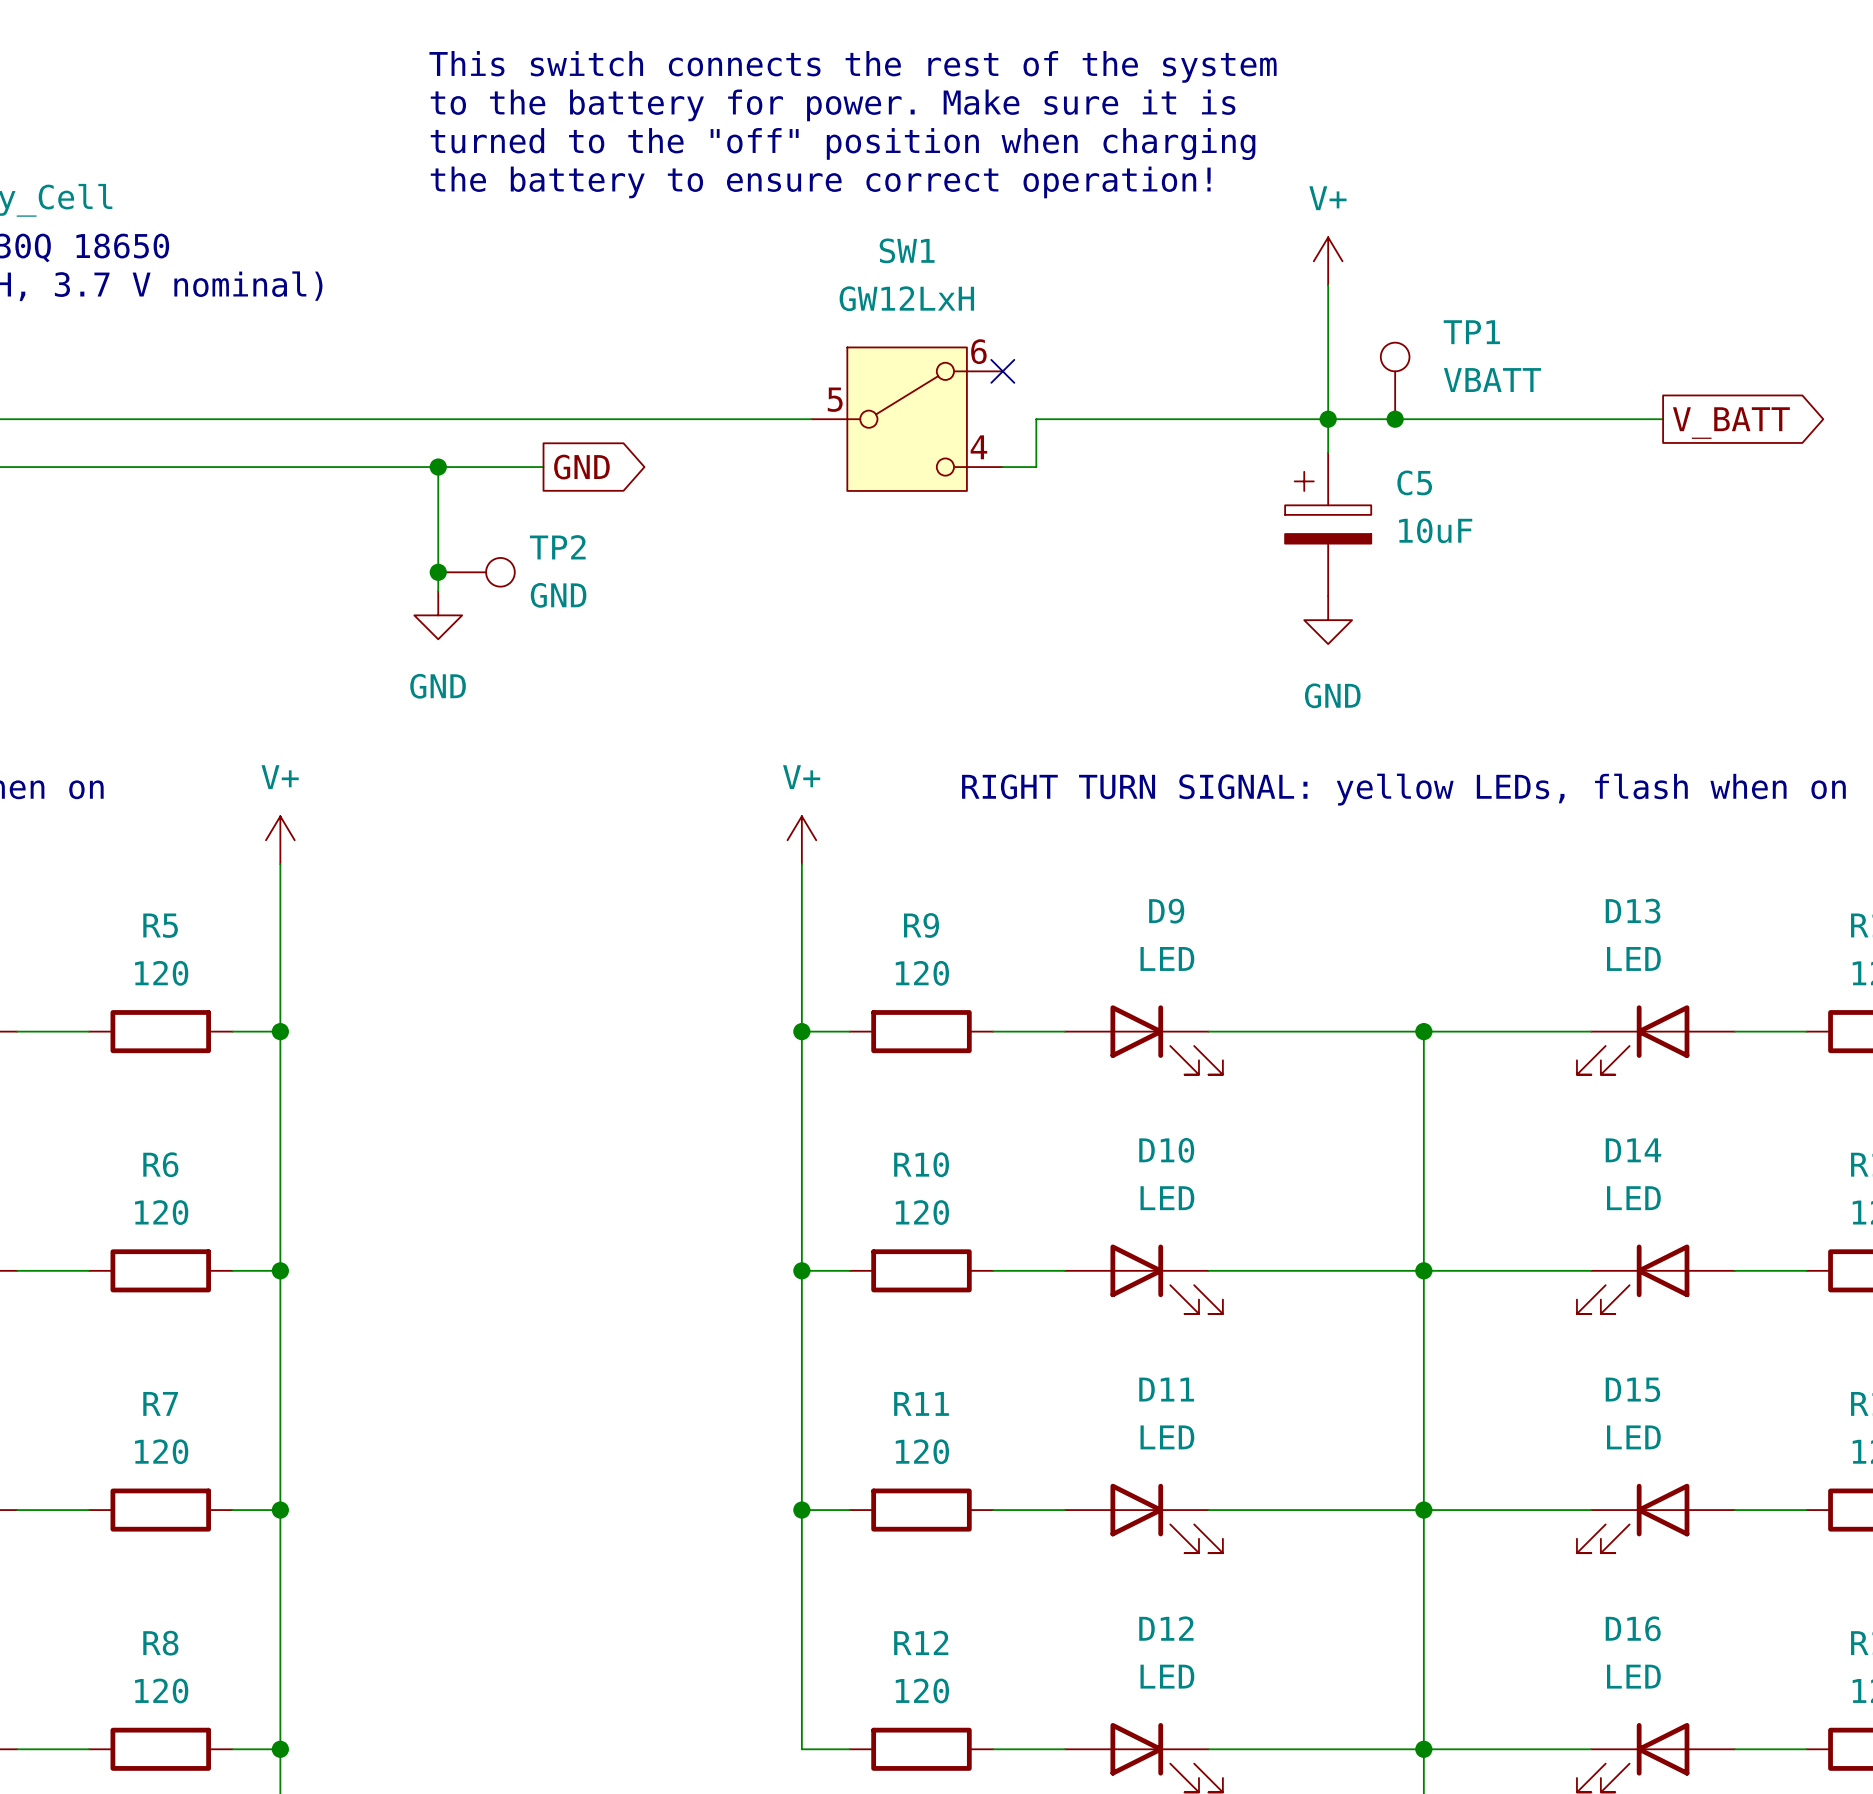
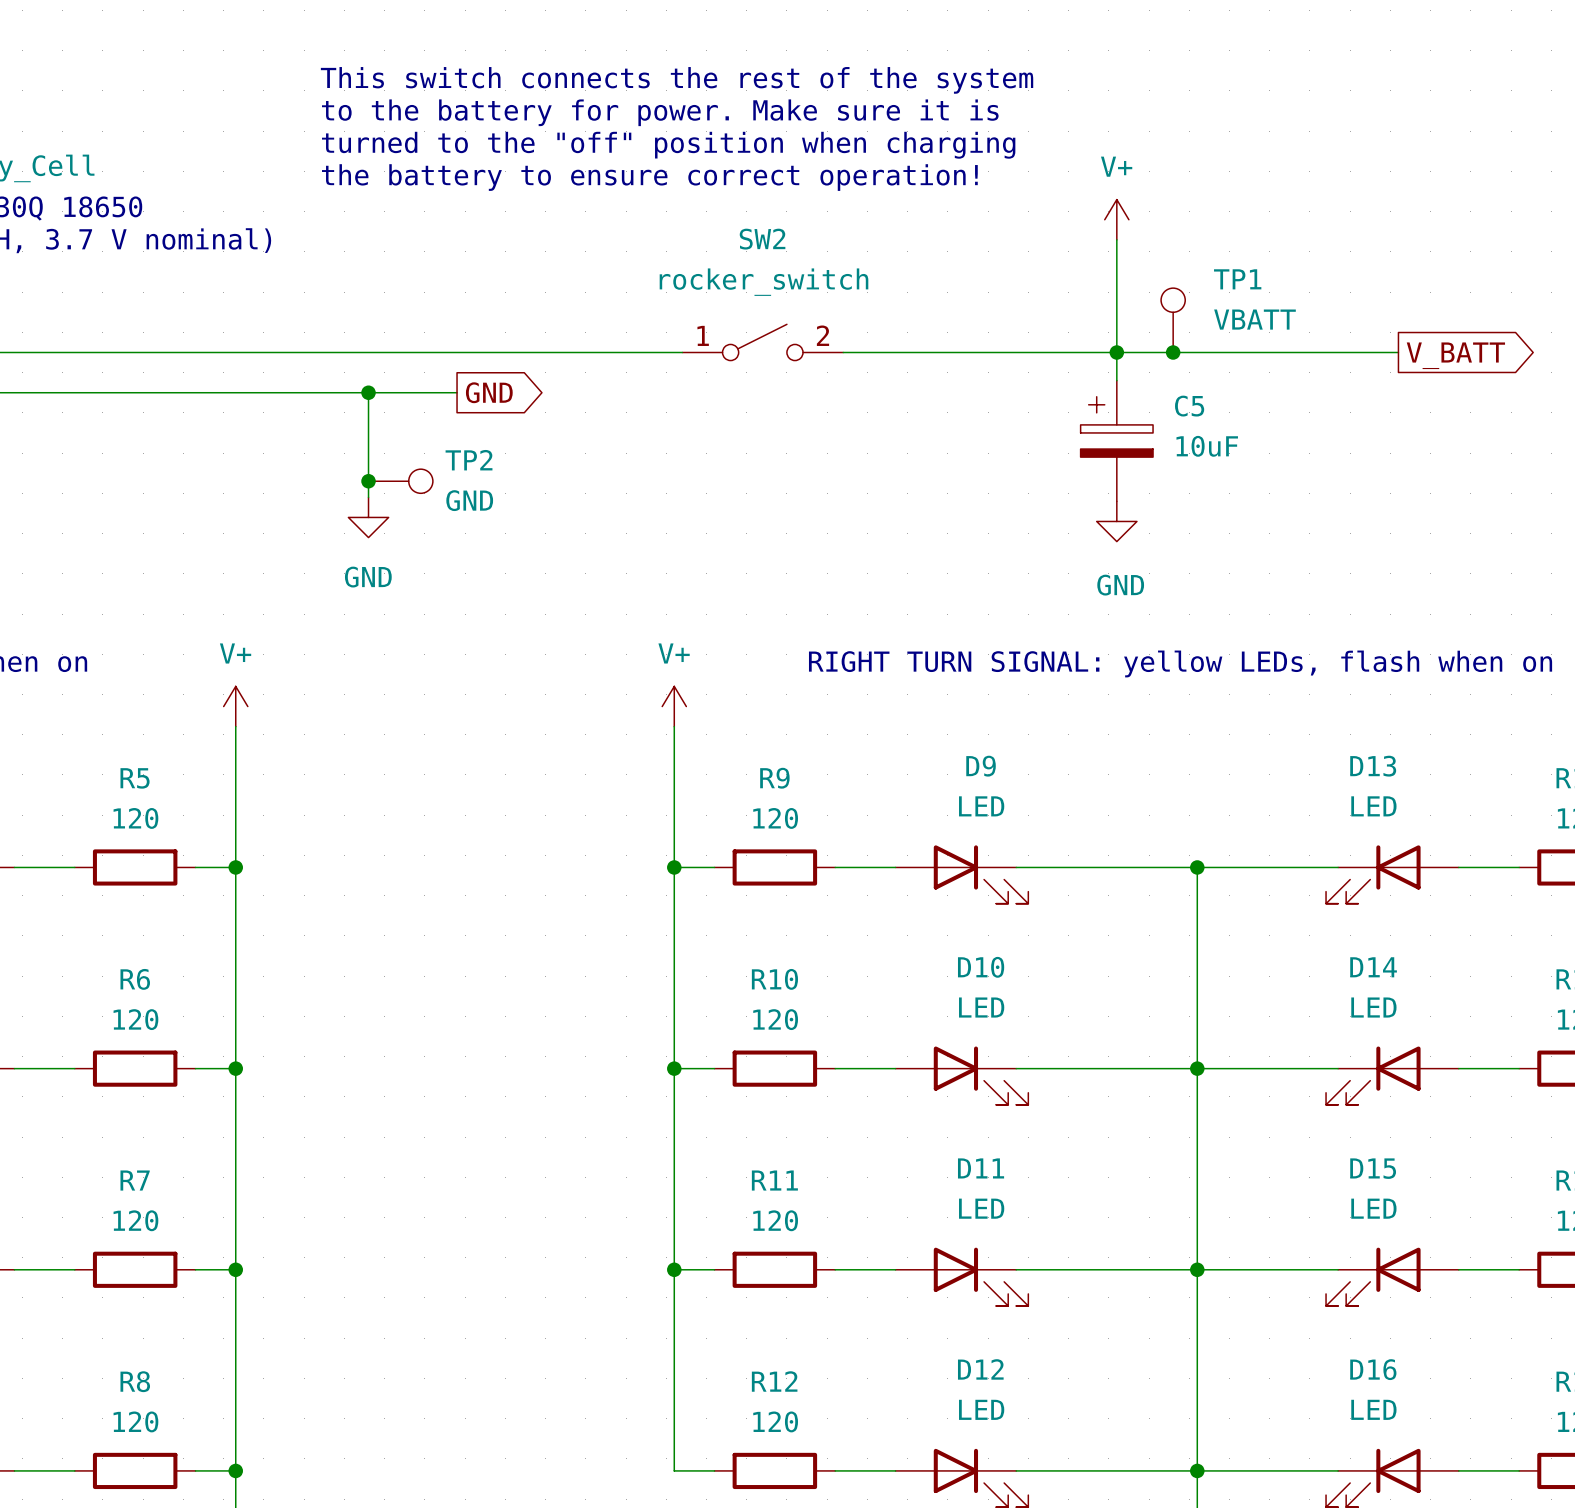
text position: This switch connects the rest of the system (853, 66) -> This switch connects the rest of the system (677, 80)
text position: to the battery for power. Make sure it is (833, 105) -> to the battery for power. Make sure it is (660, 112)
text position: turned to the "off" position when charging (843, 144) -> turned to the "off" position when charging (668, 145)
text position: the battery to ensure correct operation! (820, 182) -> the battery to ensure correct operation! (649, 177)
no-connect mark: (1002, 371) -> none
SW2: none -> rocker_switch (762, 342)
SW1: GW12LxH (907, 419) -> none
wire: (1036, 419) (1036, 467) (1002, 467) -> (871, 352) (843, 352)

